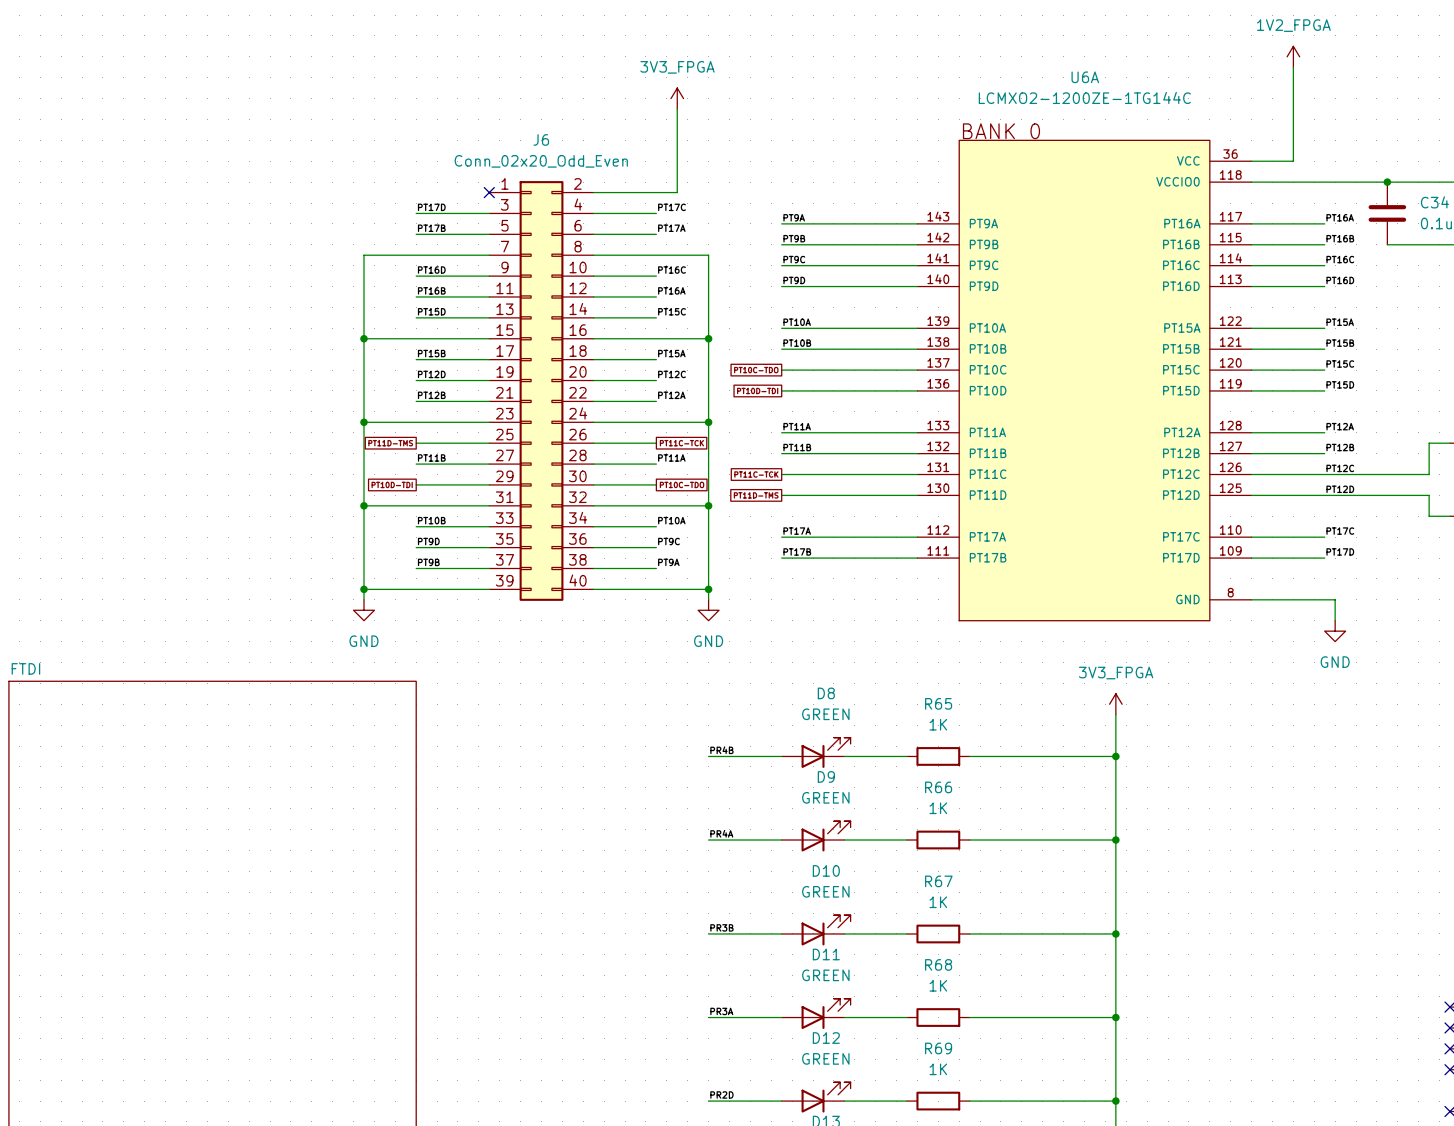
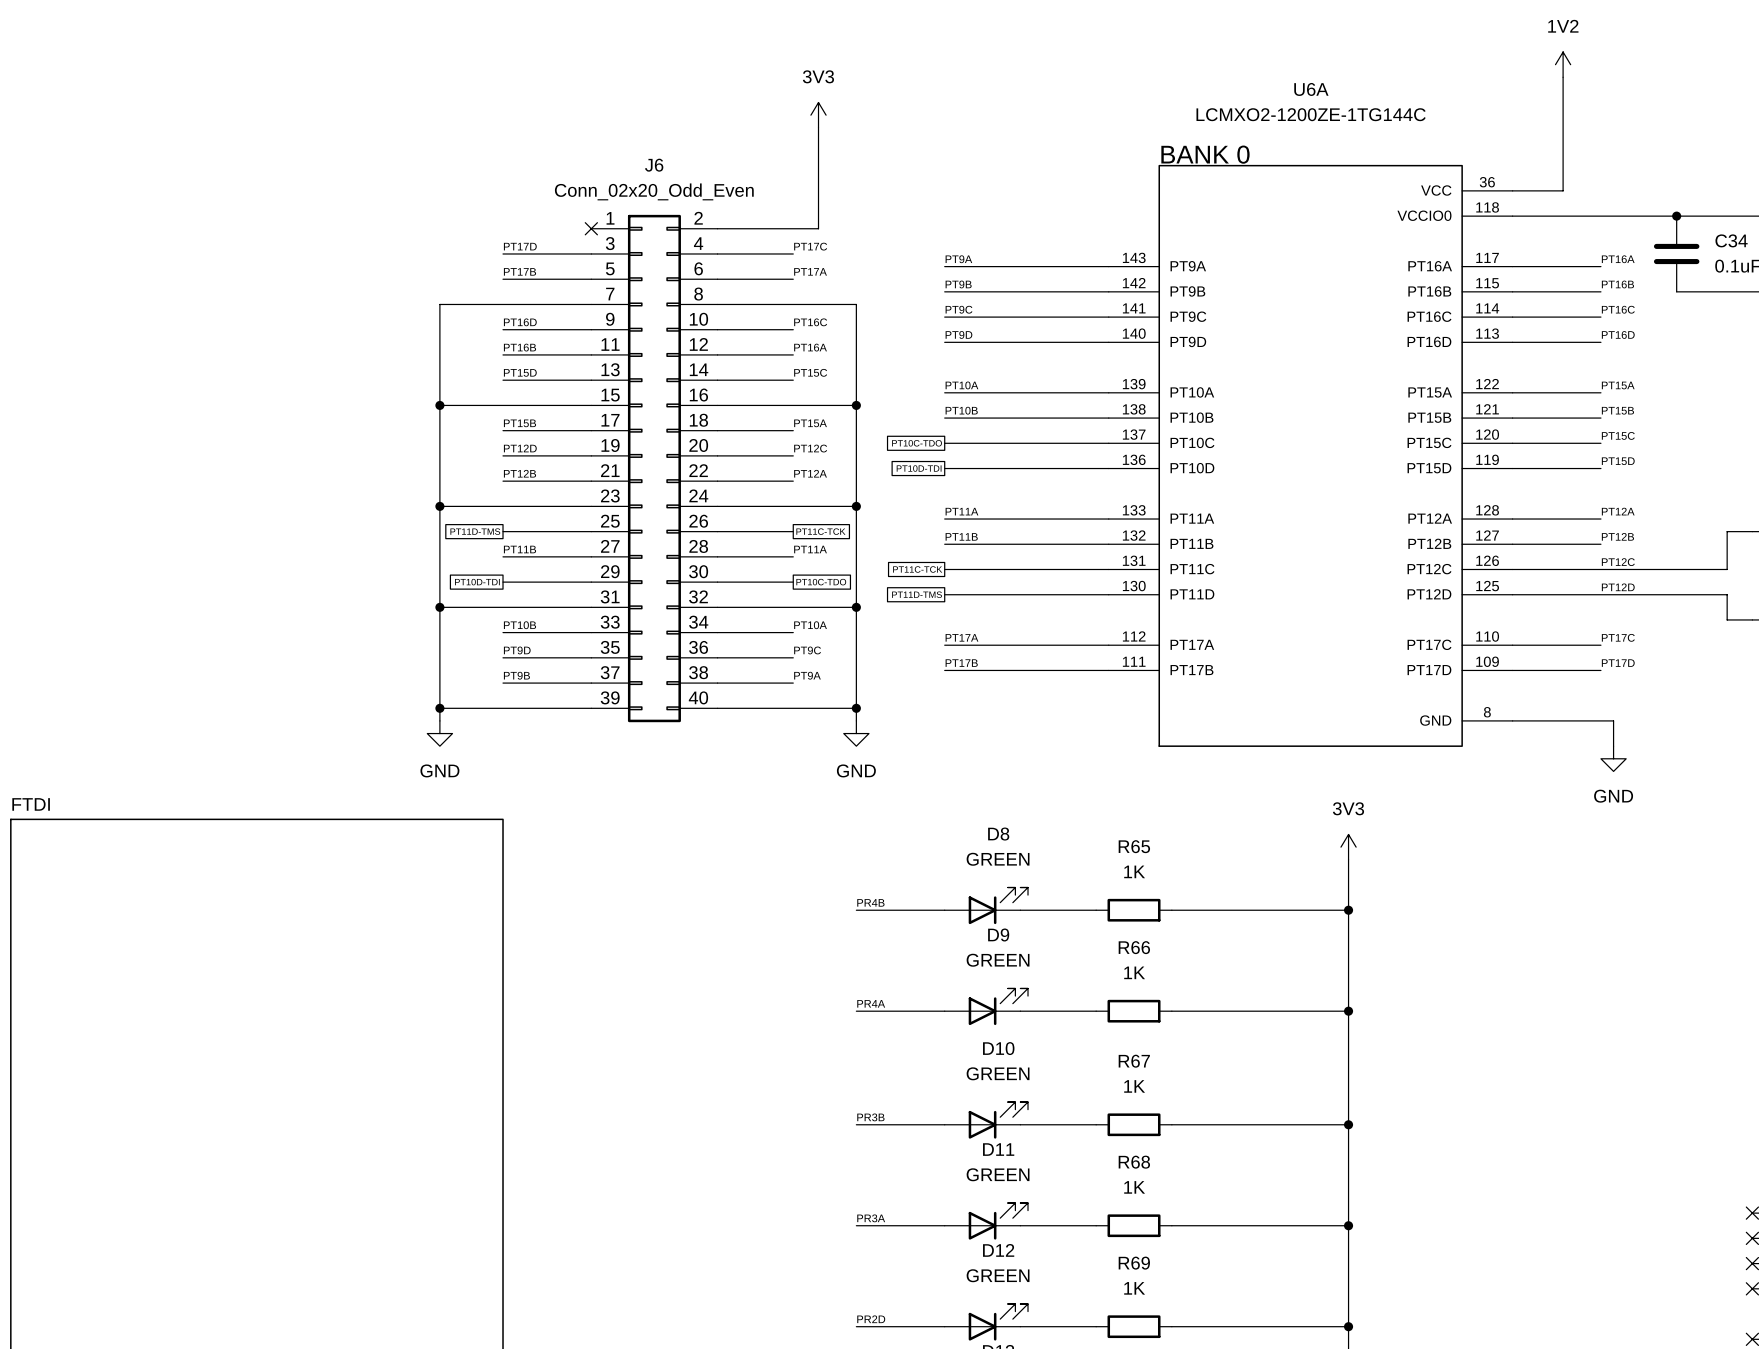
power symbol: 1V2_FPGA (1293, 56) -> 1V2 (1563, 64)
power symbol: 3V3_FPGA (677, 98) -> 3V3 (818, 115)
power symbol: 3V3_FPGA (1115, 704) -> 3V3 (1348, 847)

